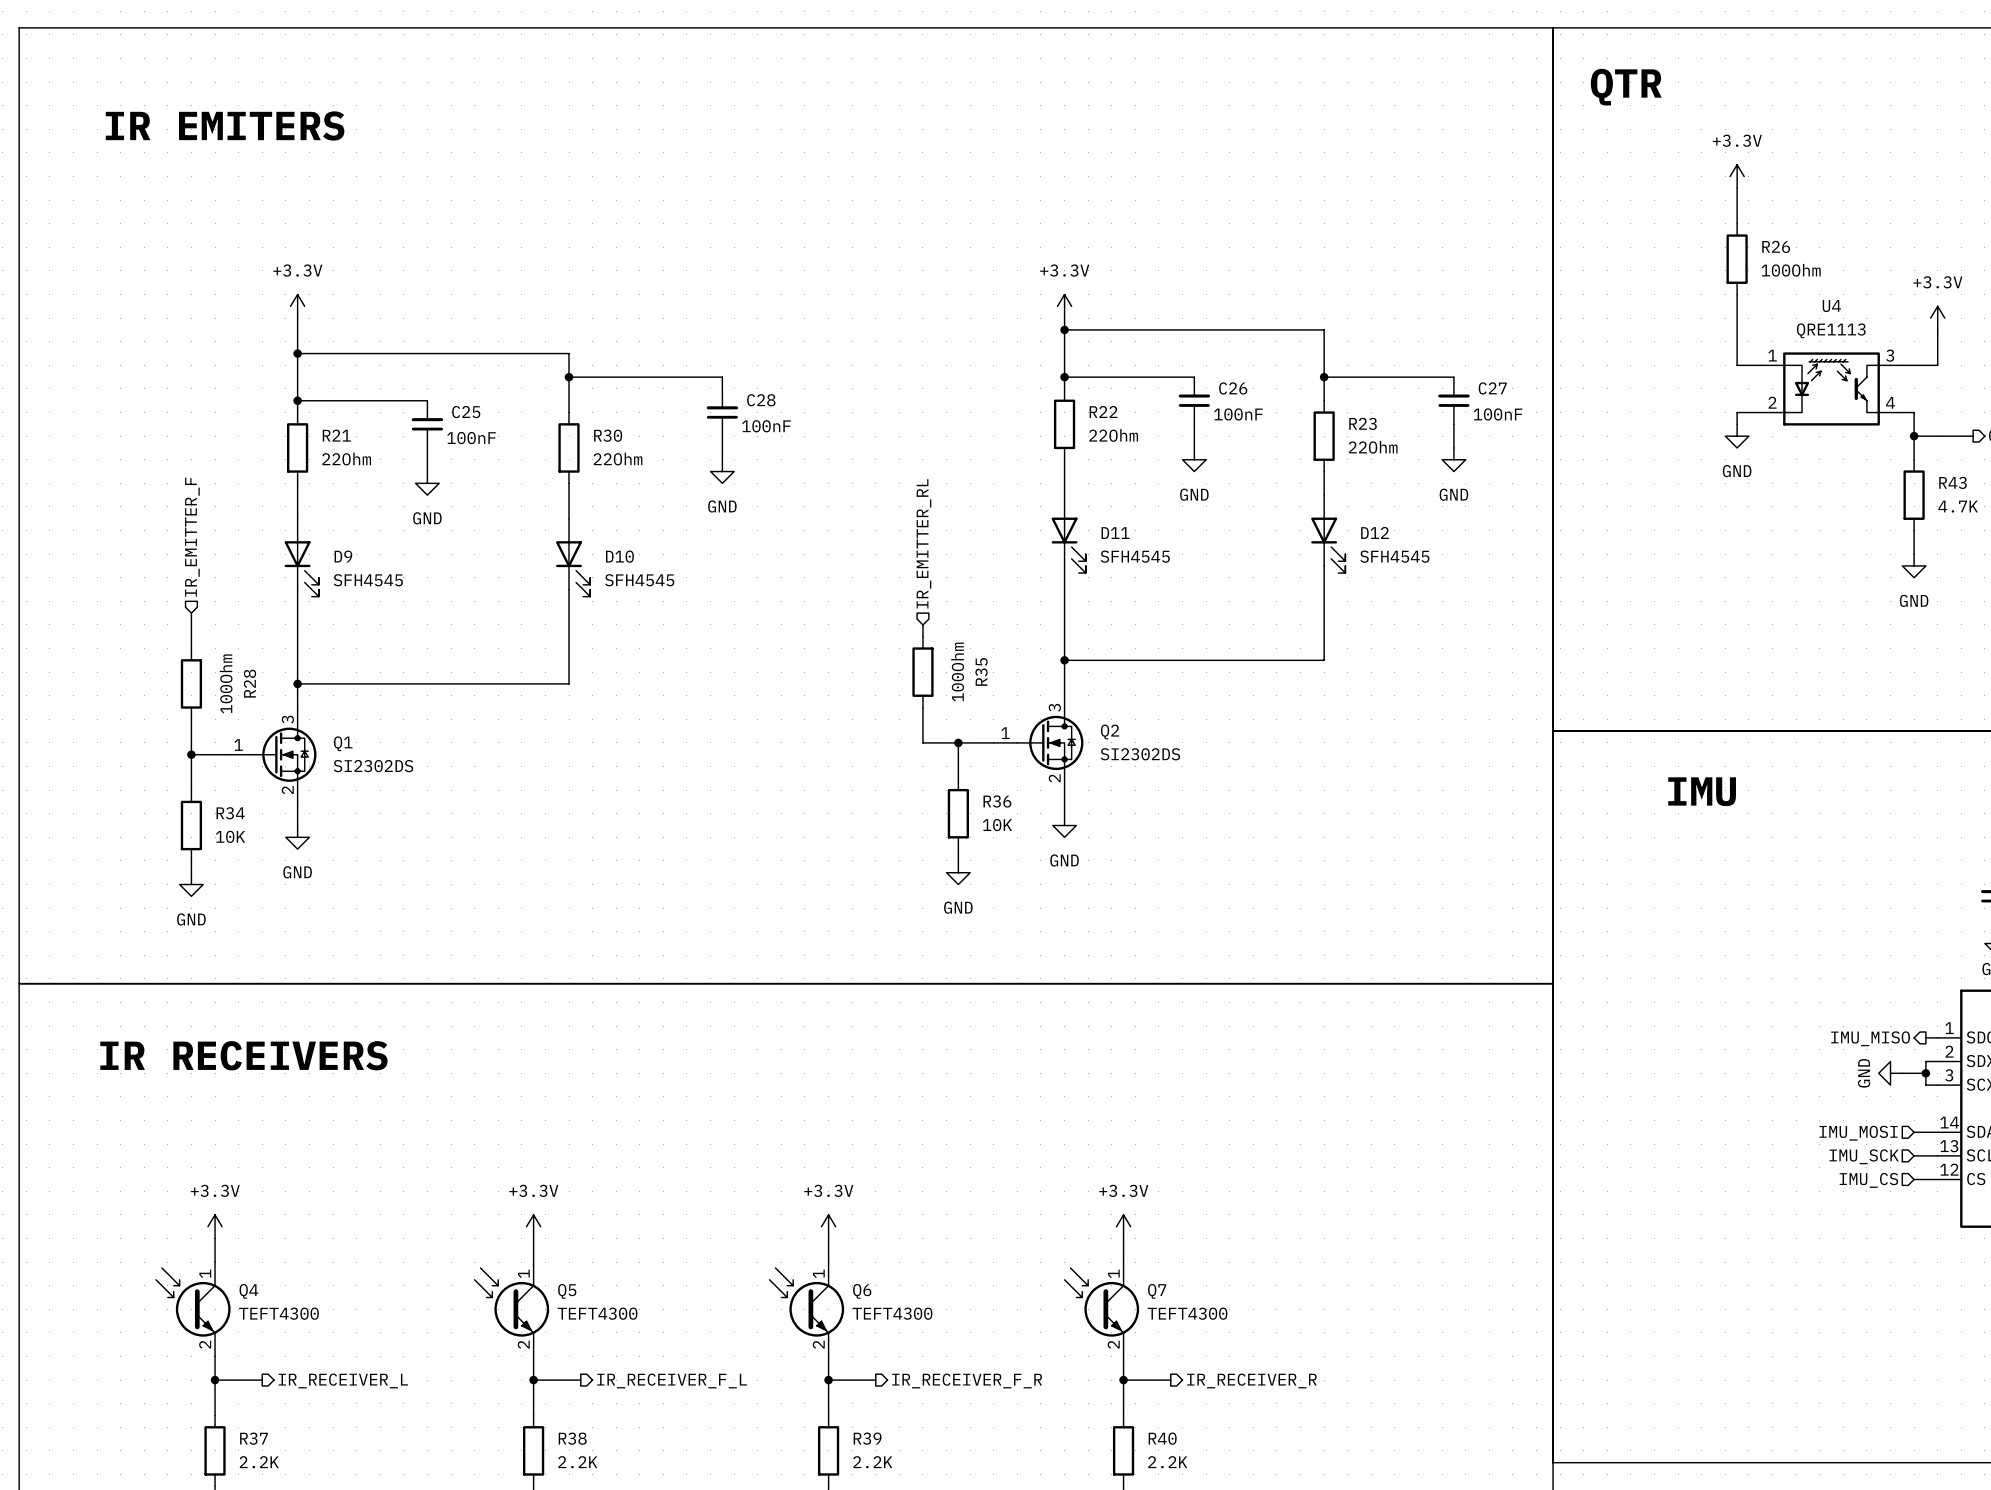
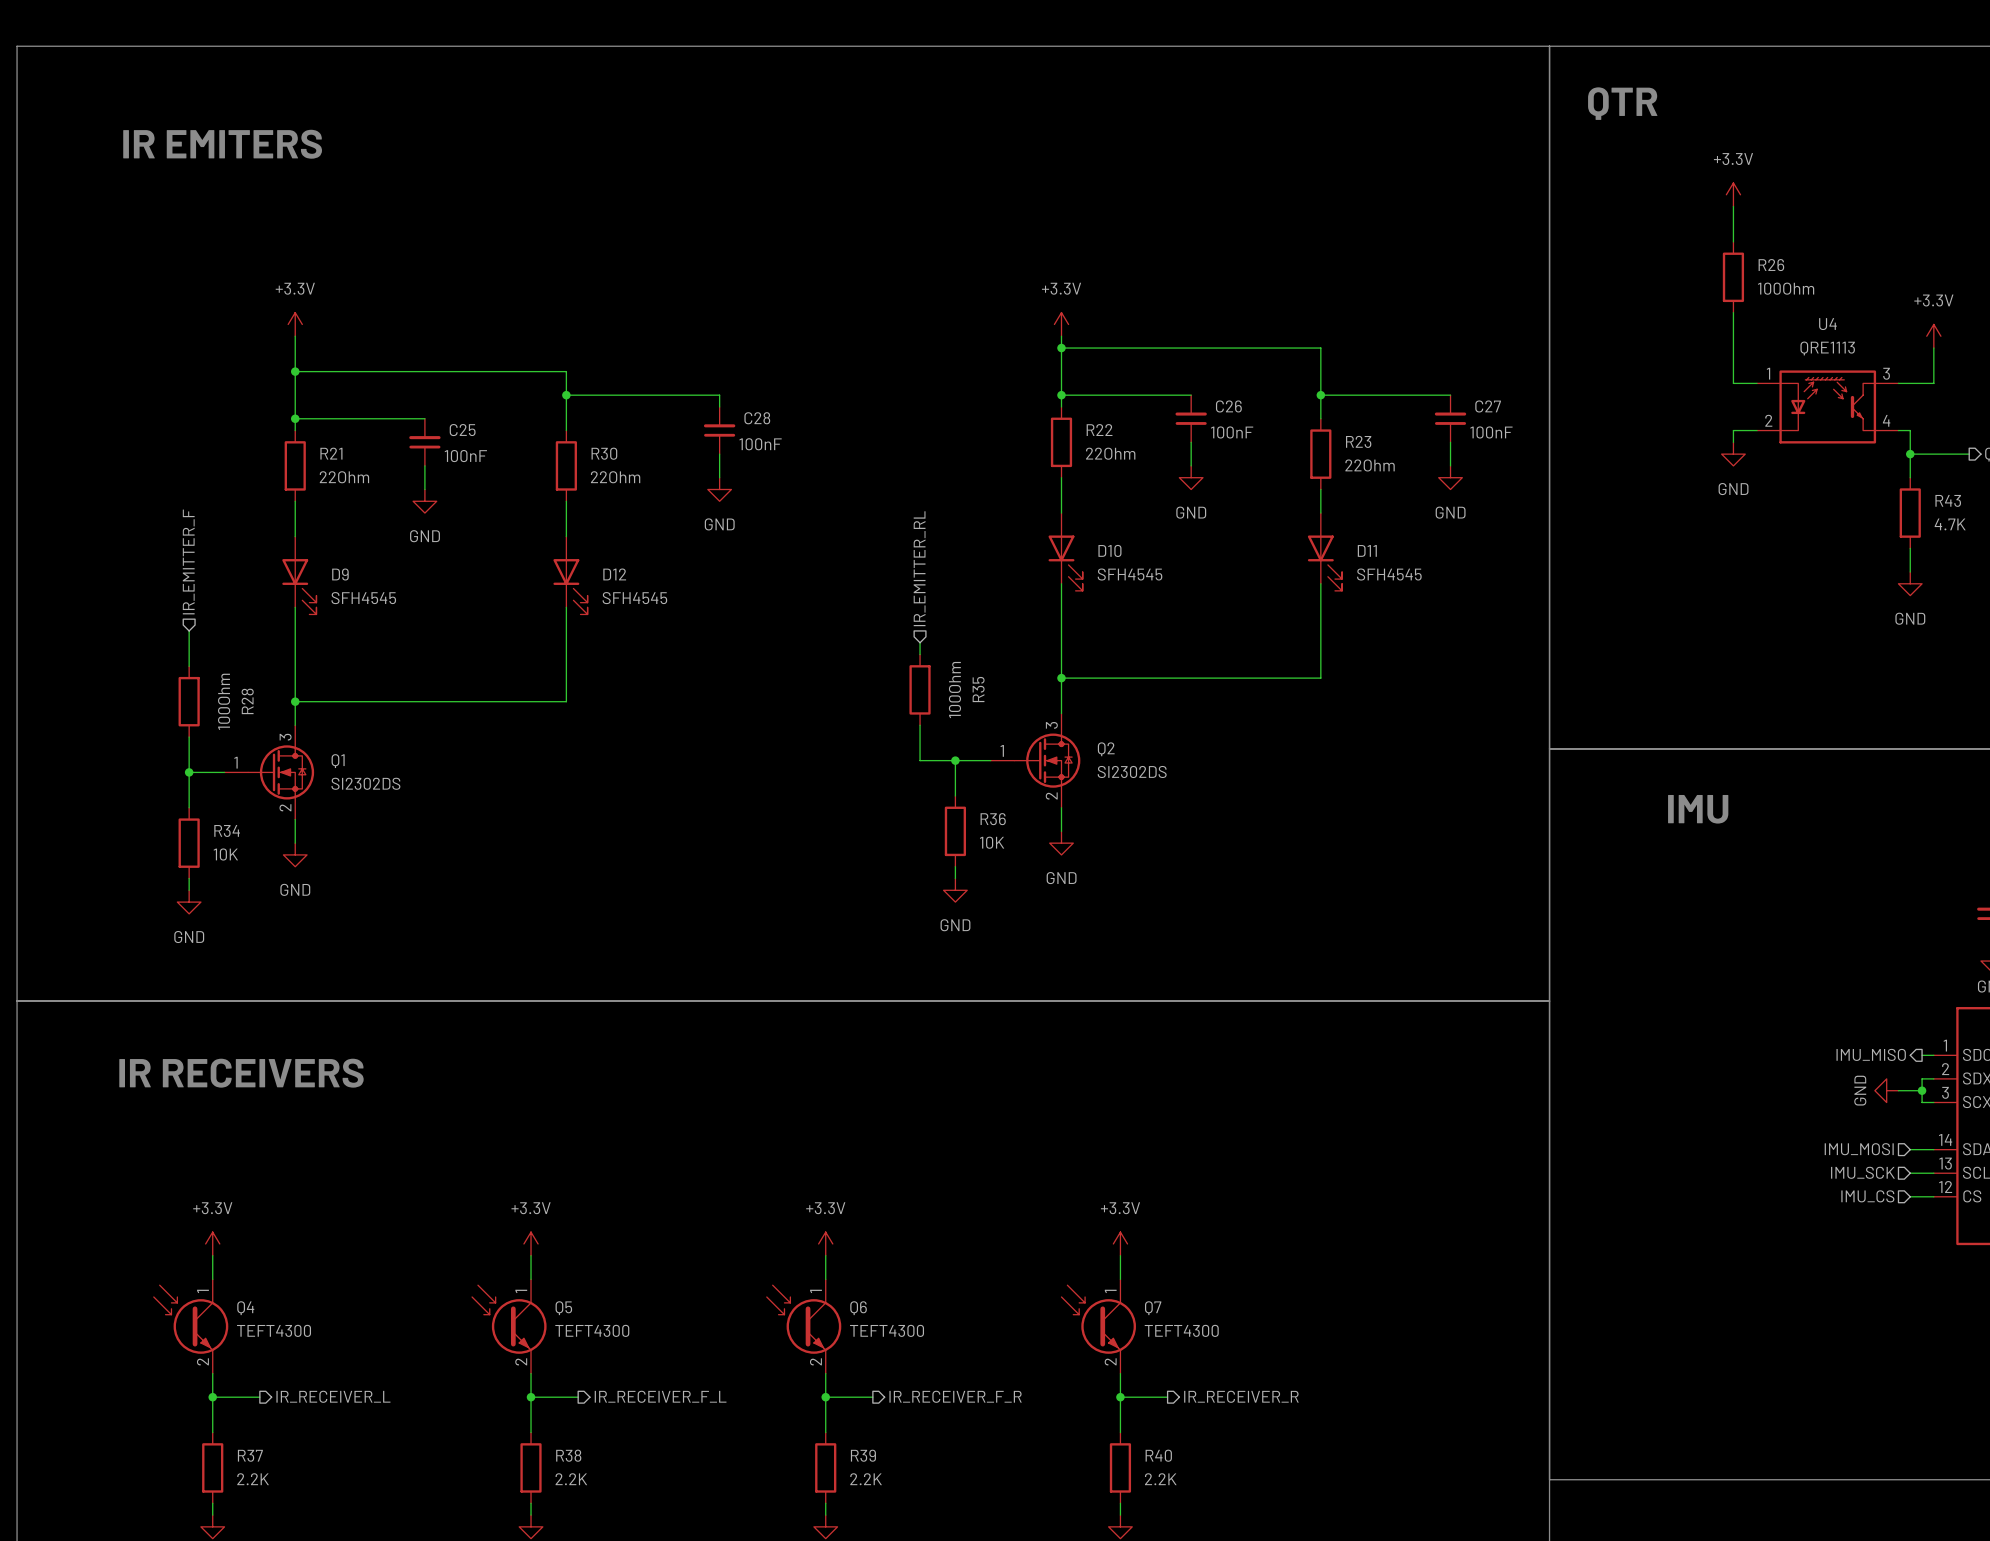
D12 name: D12 (1375, 532) -> D11 (1367, 550)
D11 name: D11 (1115, 533) -> D10 (1109, 550)
D10 name: D10 (619, 556) -> D12 (614, 574)

